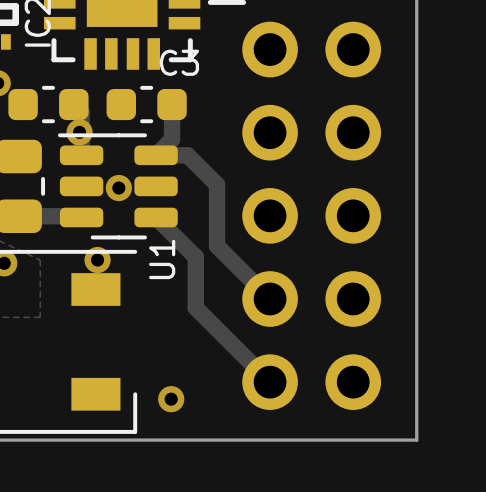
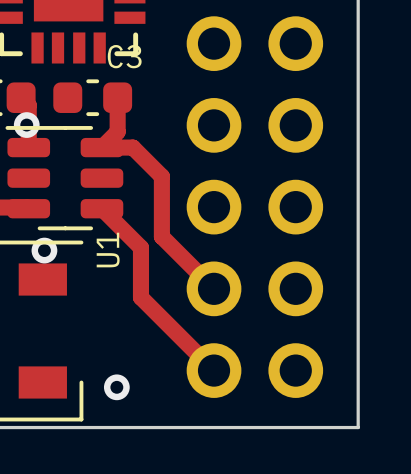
via: (118, 188) -> none

